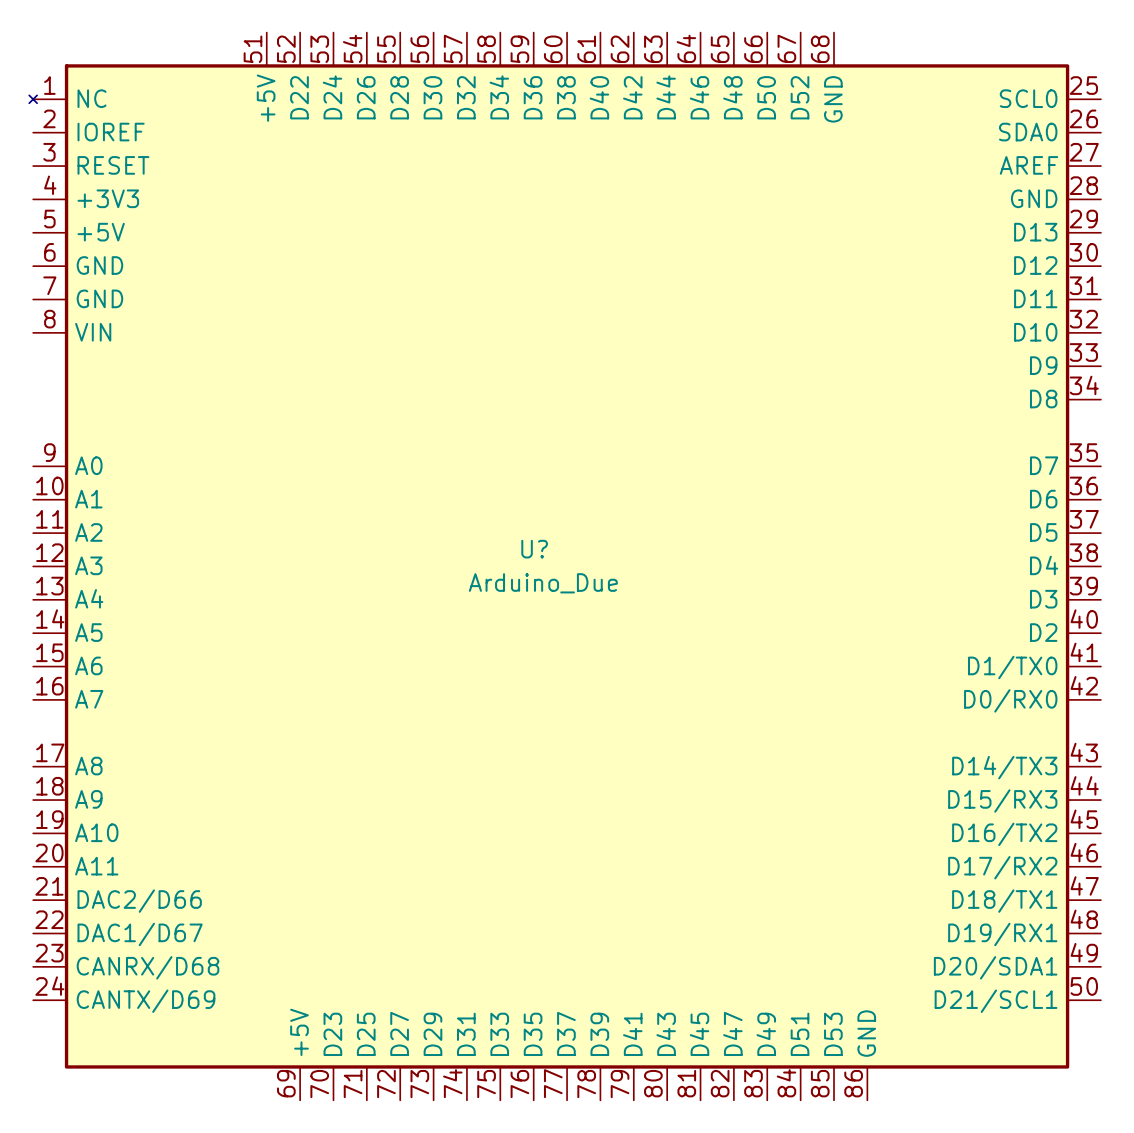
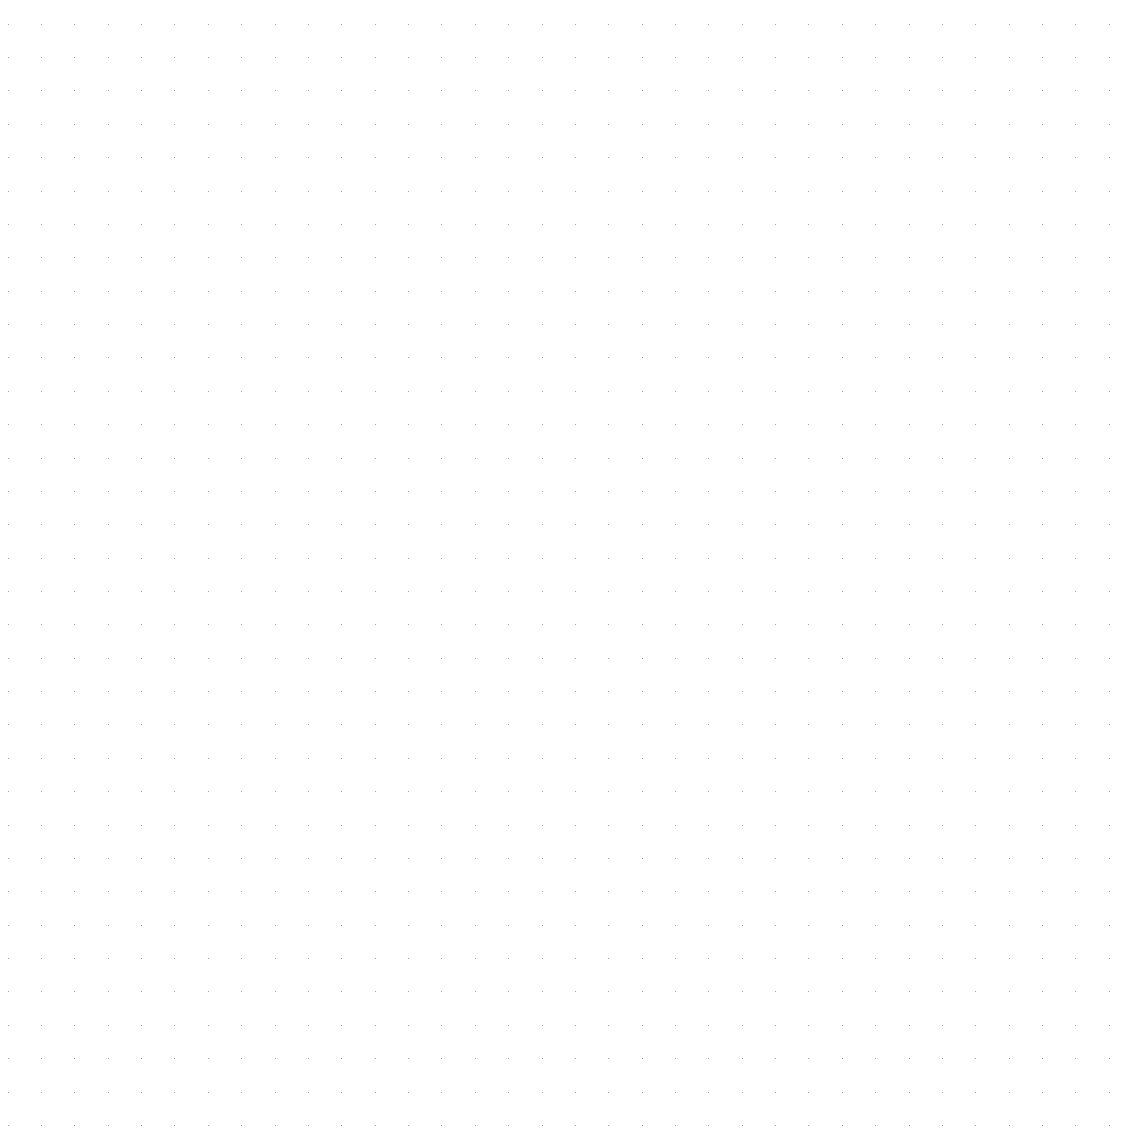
U?: Arduino_Due (565, 566) -> none

